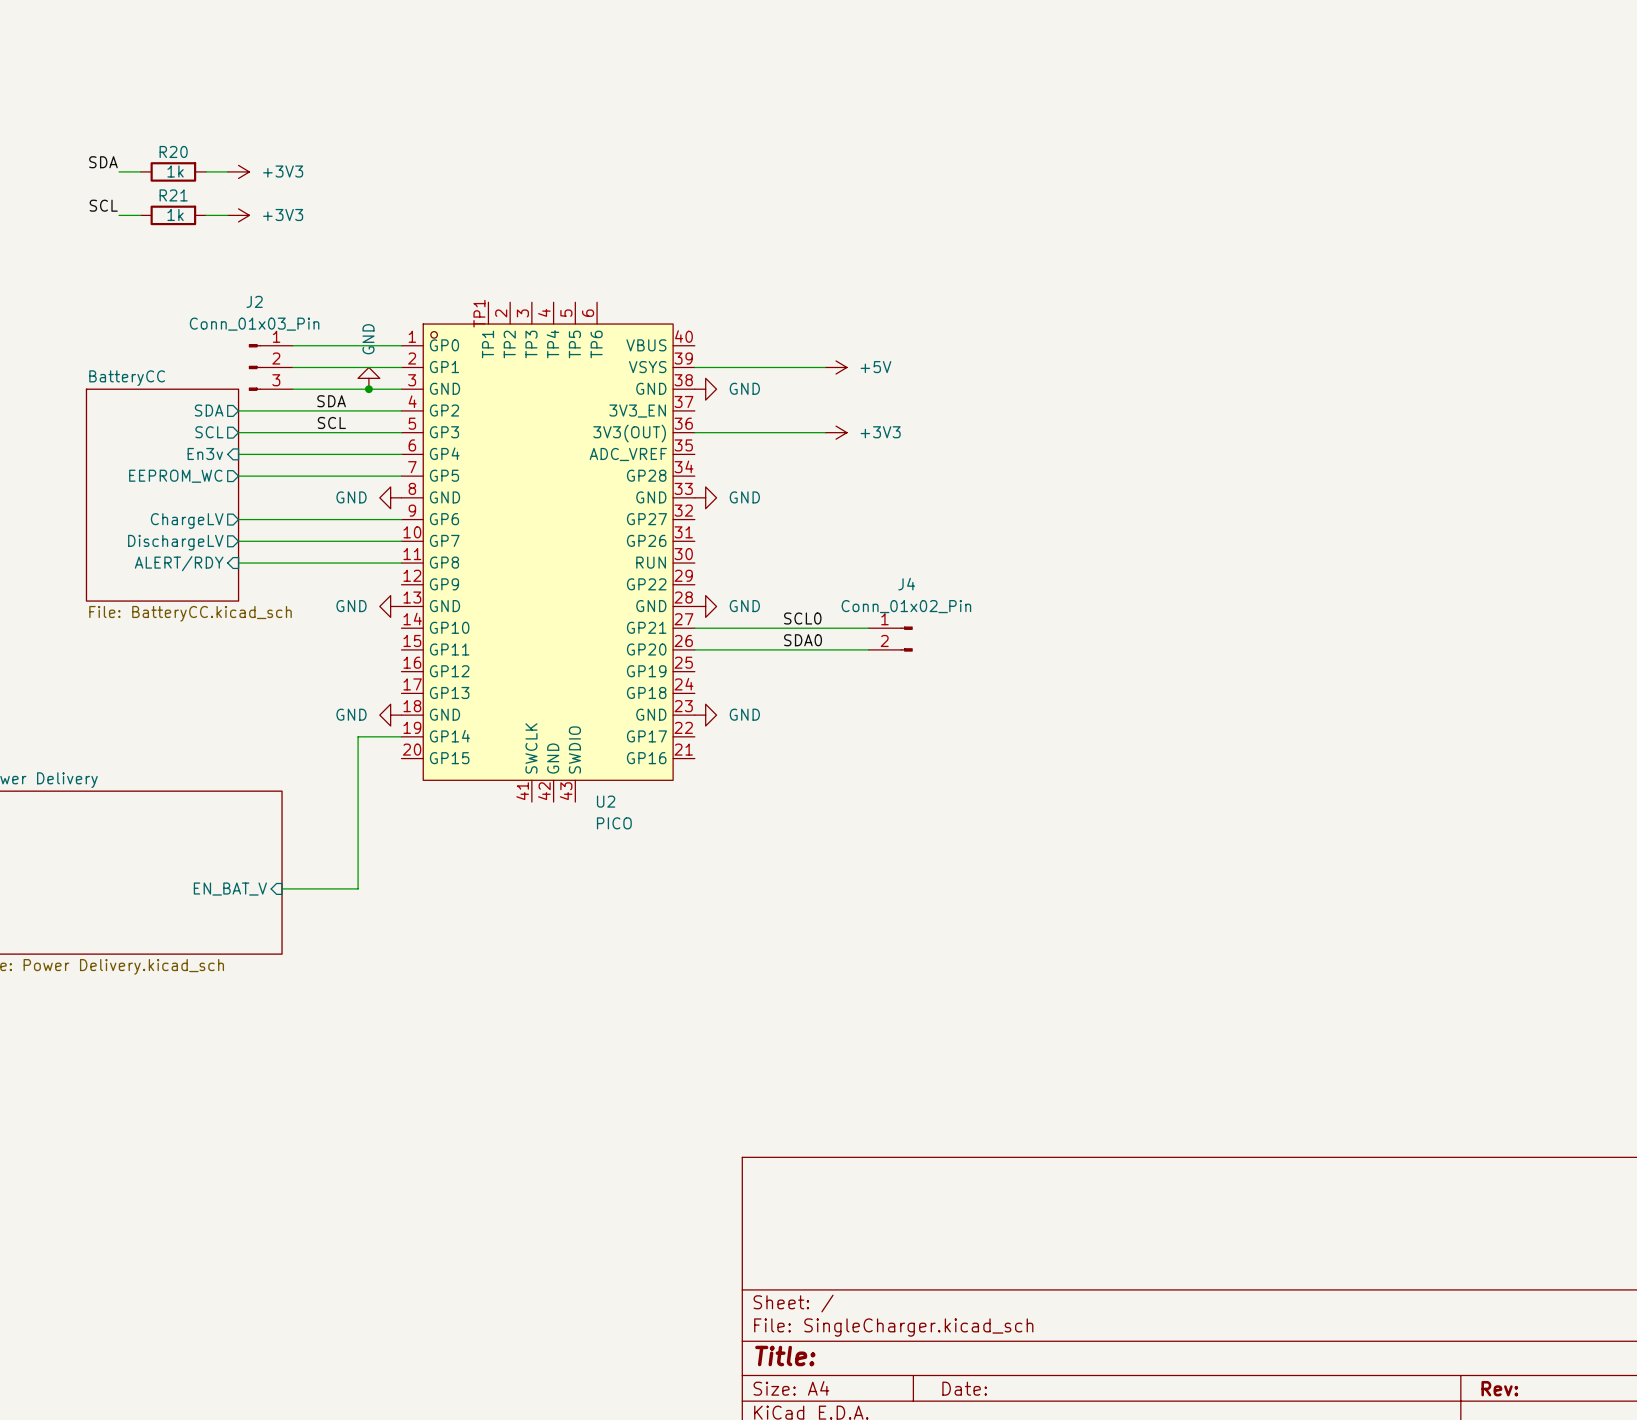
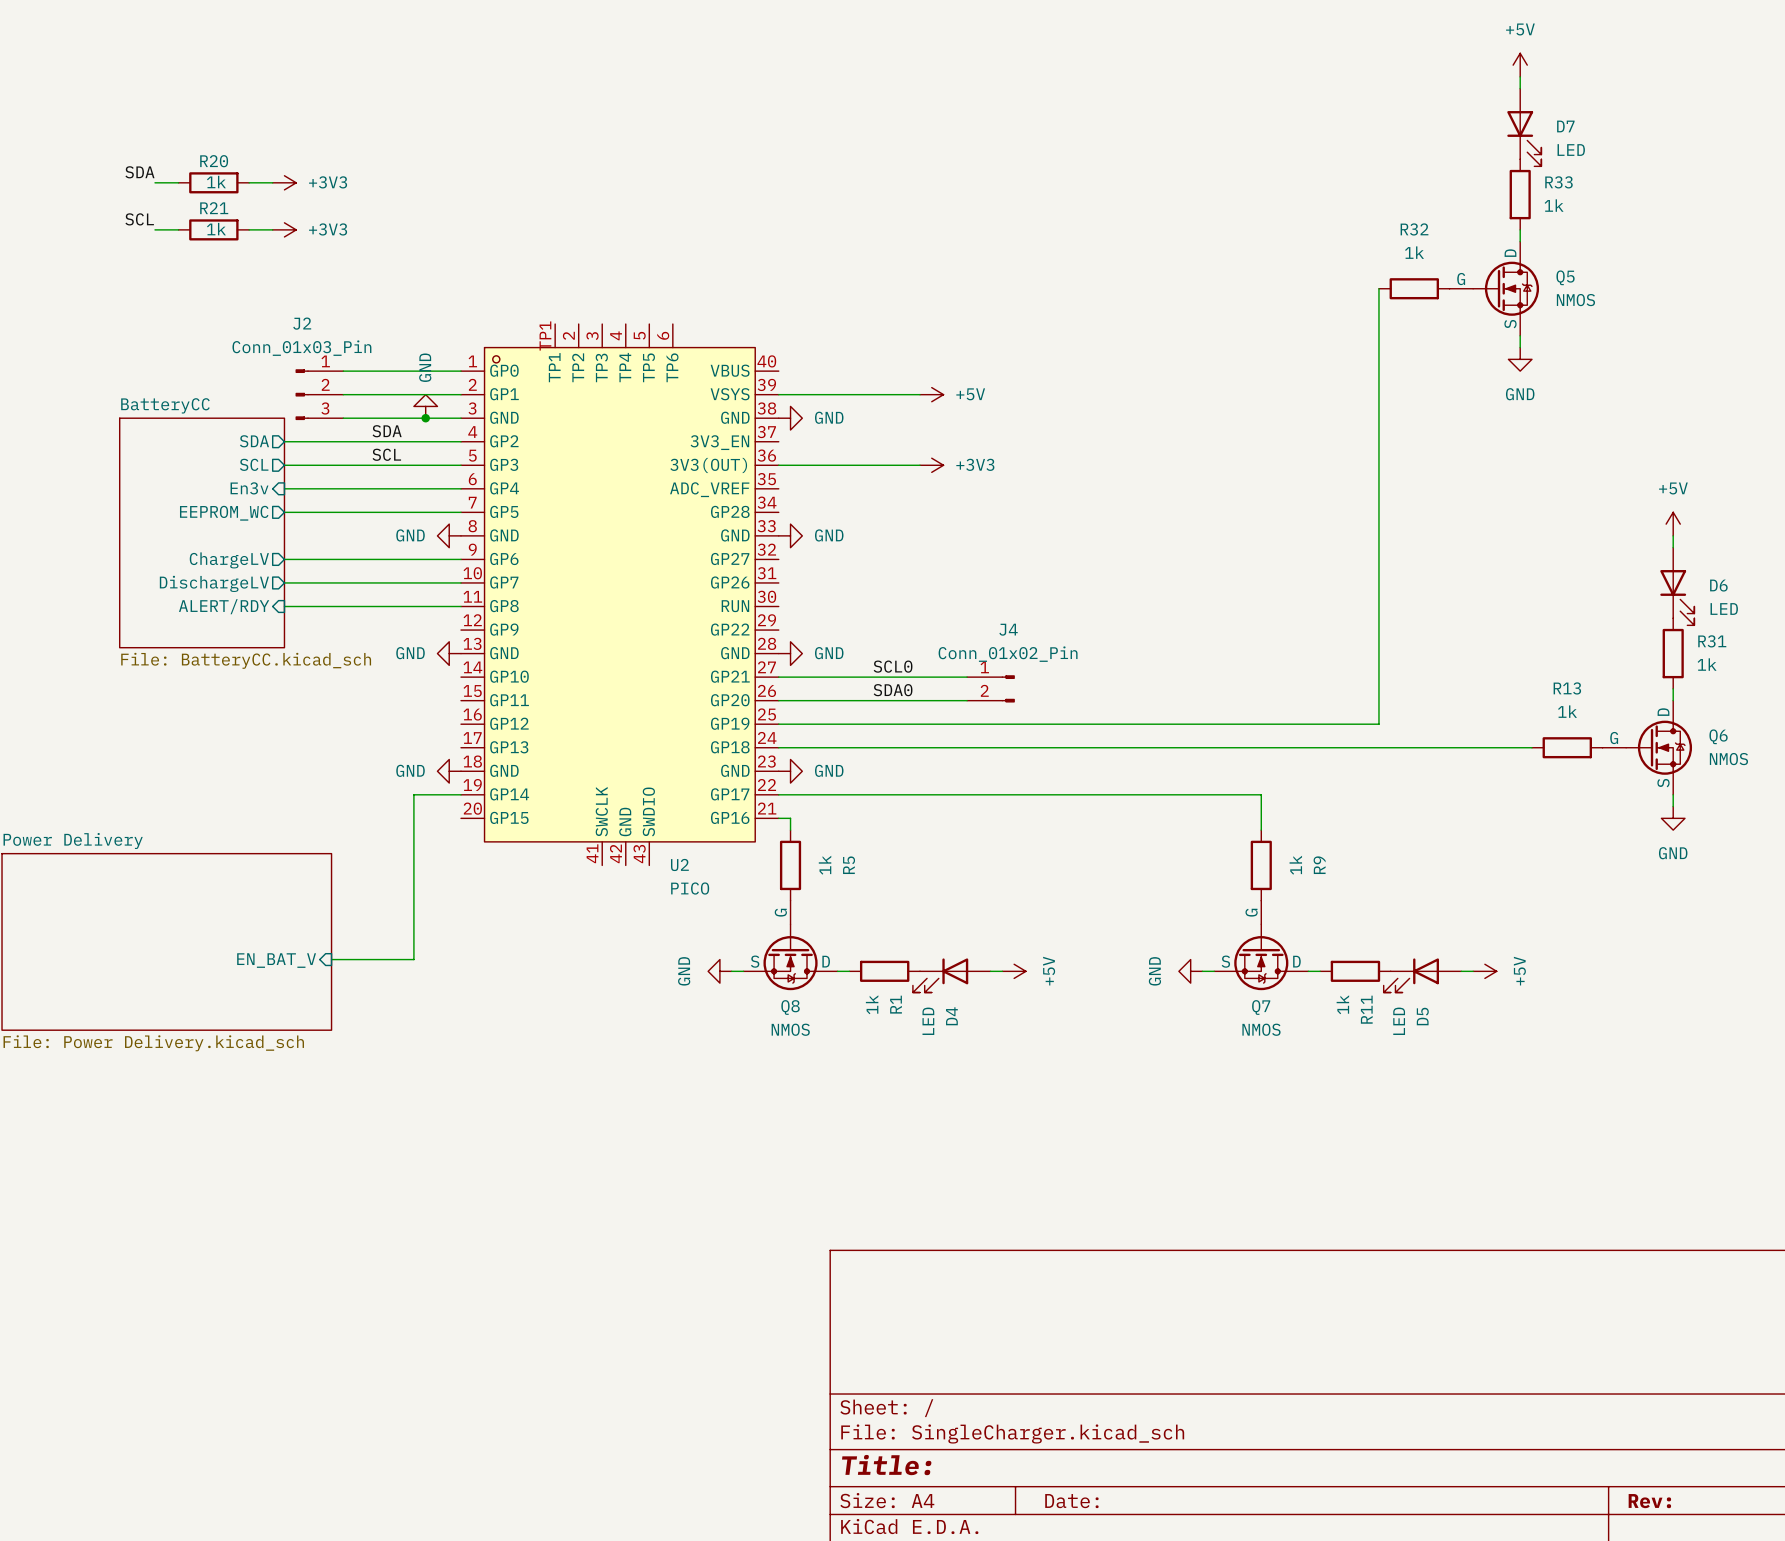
power symbol: none -> +5V (1520, 65)
wire: none -> (1520, 76) (1520, 88)
D7: none -> LED (1524, 127)
R33: none -> 1k (1520, 194)
wire: none -> (1520, 229) (1520, 241)
wire: none -> (1378, 288) (1378, 724) (778, 724)
R32: none -> 1k (1414, 288)
Q5: none -> NMOS (1494, 288)
wire: none -> (1520, 335) (1520, 347)
power symbol: none -> GND (1520, 359)
power symbol: none -> +5V (1673, 524)
wire: none -> (1673, 535) (1673, 547)
D6: none -> LED (1677, 586)
R31: none -> 1k (1673, 653)
wire: none -> (1673, 688) (1673, 700)
wire: none -> (778, 747) (1531, 747)
R13: none -> 1k (1567, 747)
Q6: none -> NMOS (1647, 747)
wire: none -> (778, 794) (1261, 794) (1261, 830)
wire: none -> (1673, 794) (1673, 806)
wire: none -> (778, 818) (790, 818) (790, 830)
power symbol: none -> GND (1673, 818)
R5: none -> 1k (790, 865)
R9: none -> 1k (1261, 865)
Q8: none -> NMOS (790, 945)
Q7: none -> NMOS (1261, 945)
power symbol: none -> GND (719, 971)
wire: none -> (731, 971) (743, 971)
wire: none -> (837, 971) (849, 971)
R1: none -> 1k (884, 971)
wire: none -> (990, 971) (1002, 971)
power symbol: none -> +5V (1014, 971)
power symbol: none -> GND (1190, 971)
wire: none -> (1202, 971) (1214, 971)
wire: none -> (1308, 971) (1320, 971)
R11: none -> 1k (1355, 971)
wire: none -> (1461, 971) (1473, 971)
power symbol: none -> +5V (1484, 971)
D4: none -> LED (951, 975)
D5: none -> LED (1422, 975)

